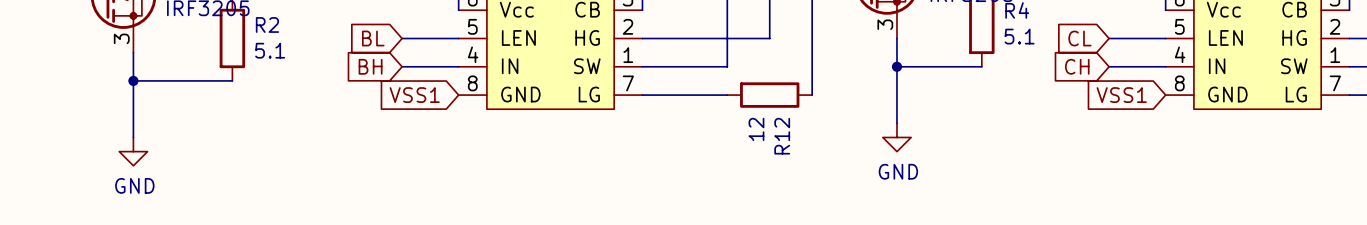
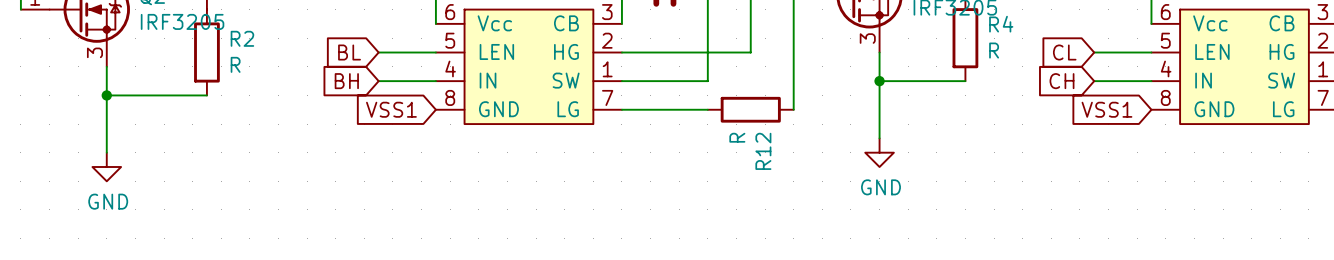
R4 value: 5.1 (1019, 36) -> R (994, 50)
R2 value: 5.1 (270, 50) -> R (235, 64)
R12 value: 12 (756, 129) -> R (737, 137)

